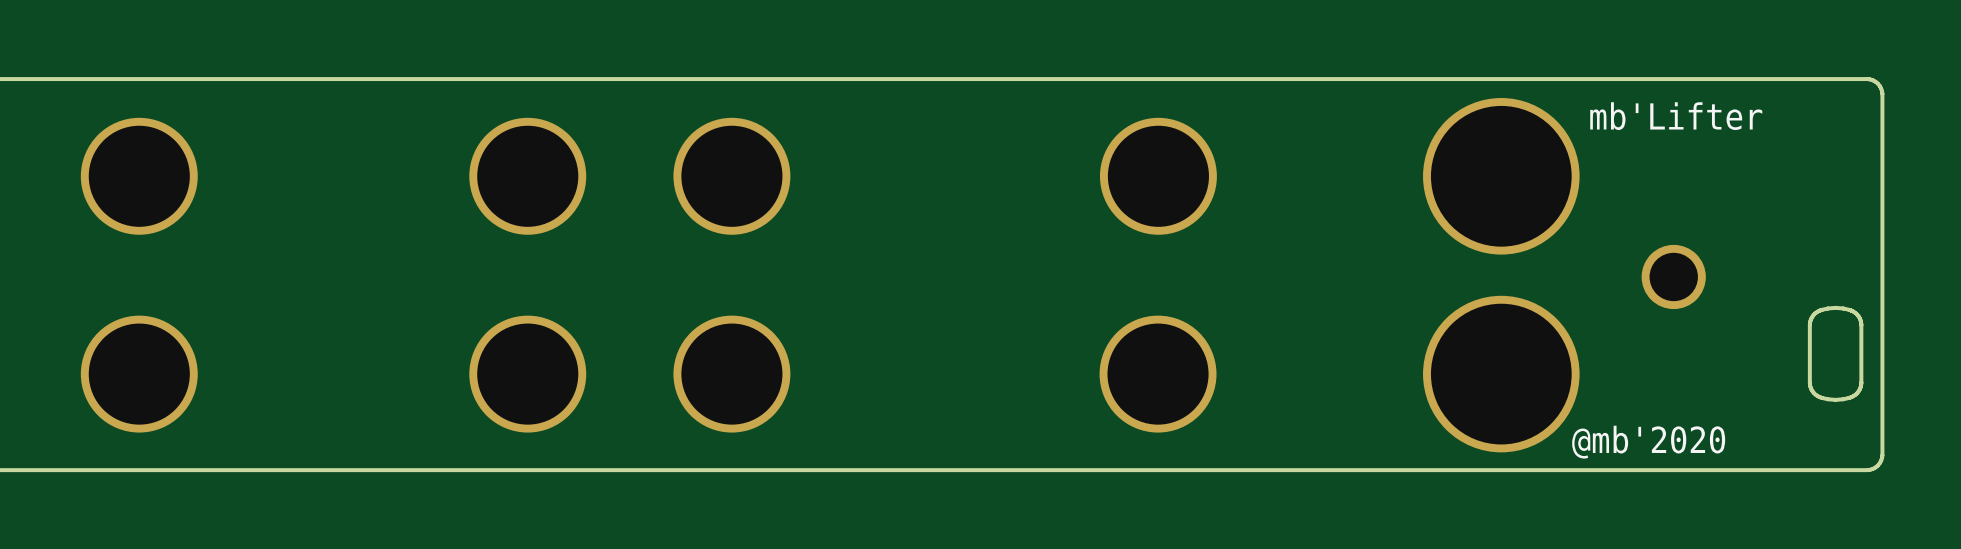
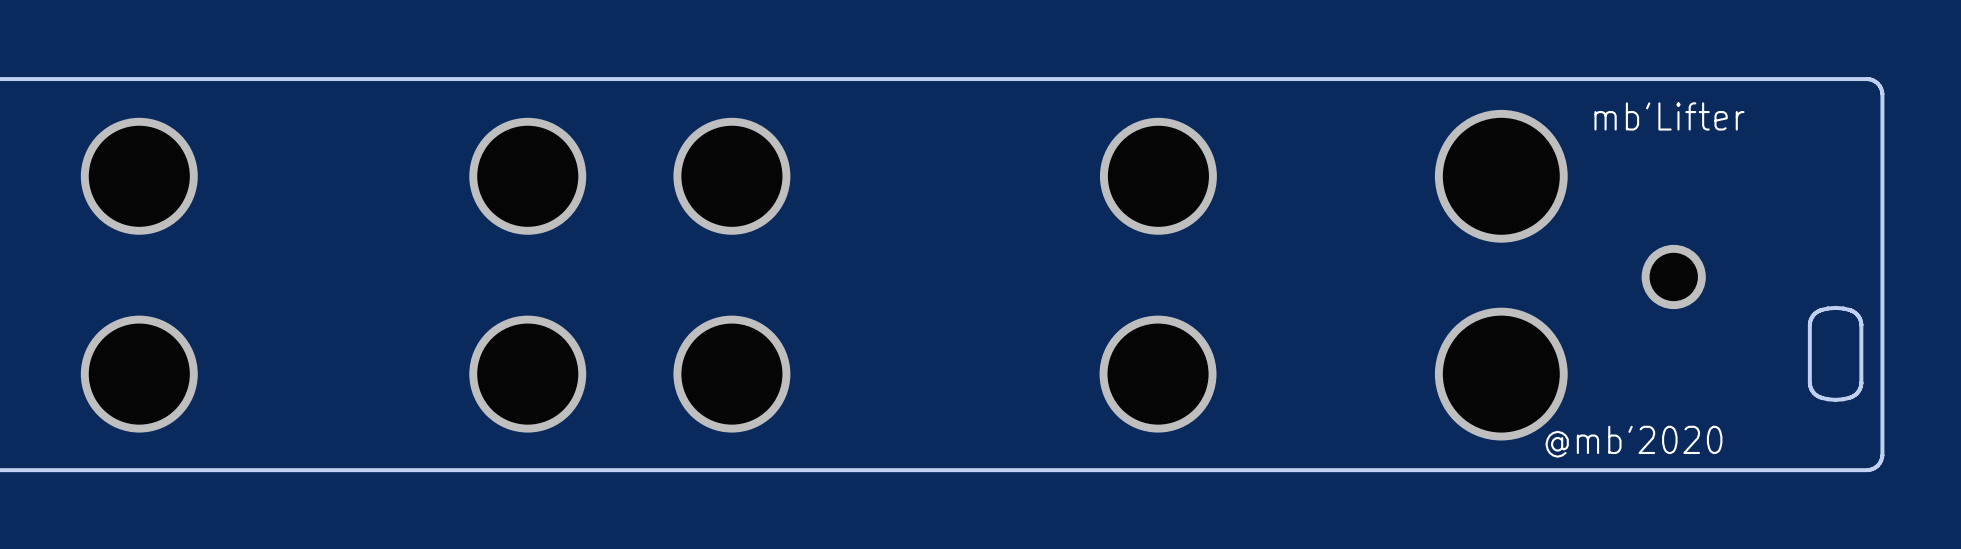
via size: [1423, 98, 1580, 255] -> [1434, 109, 1568, 243]
via size: [1423, 295, 1580, 453] -> [1434, 307, 1568, 441]

